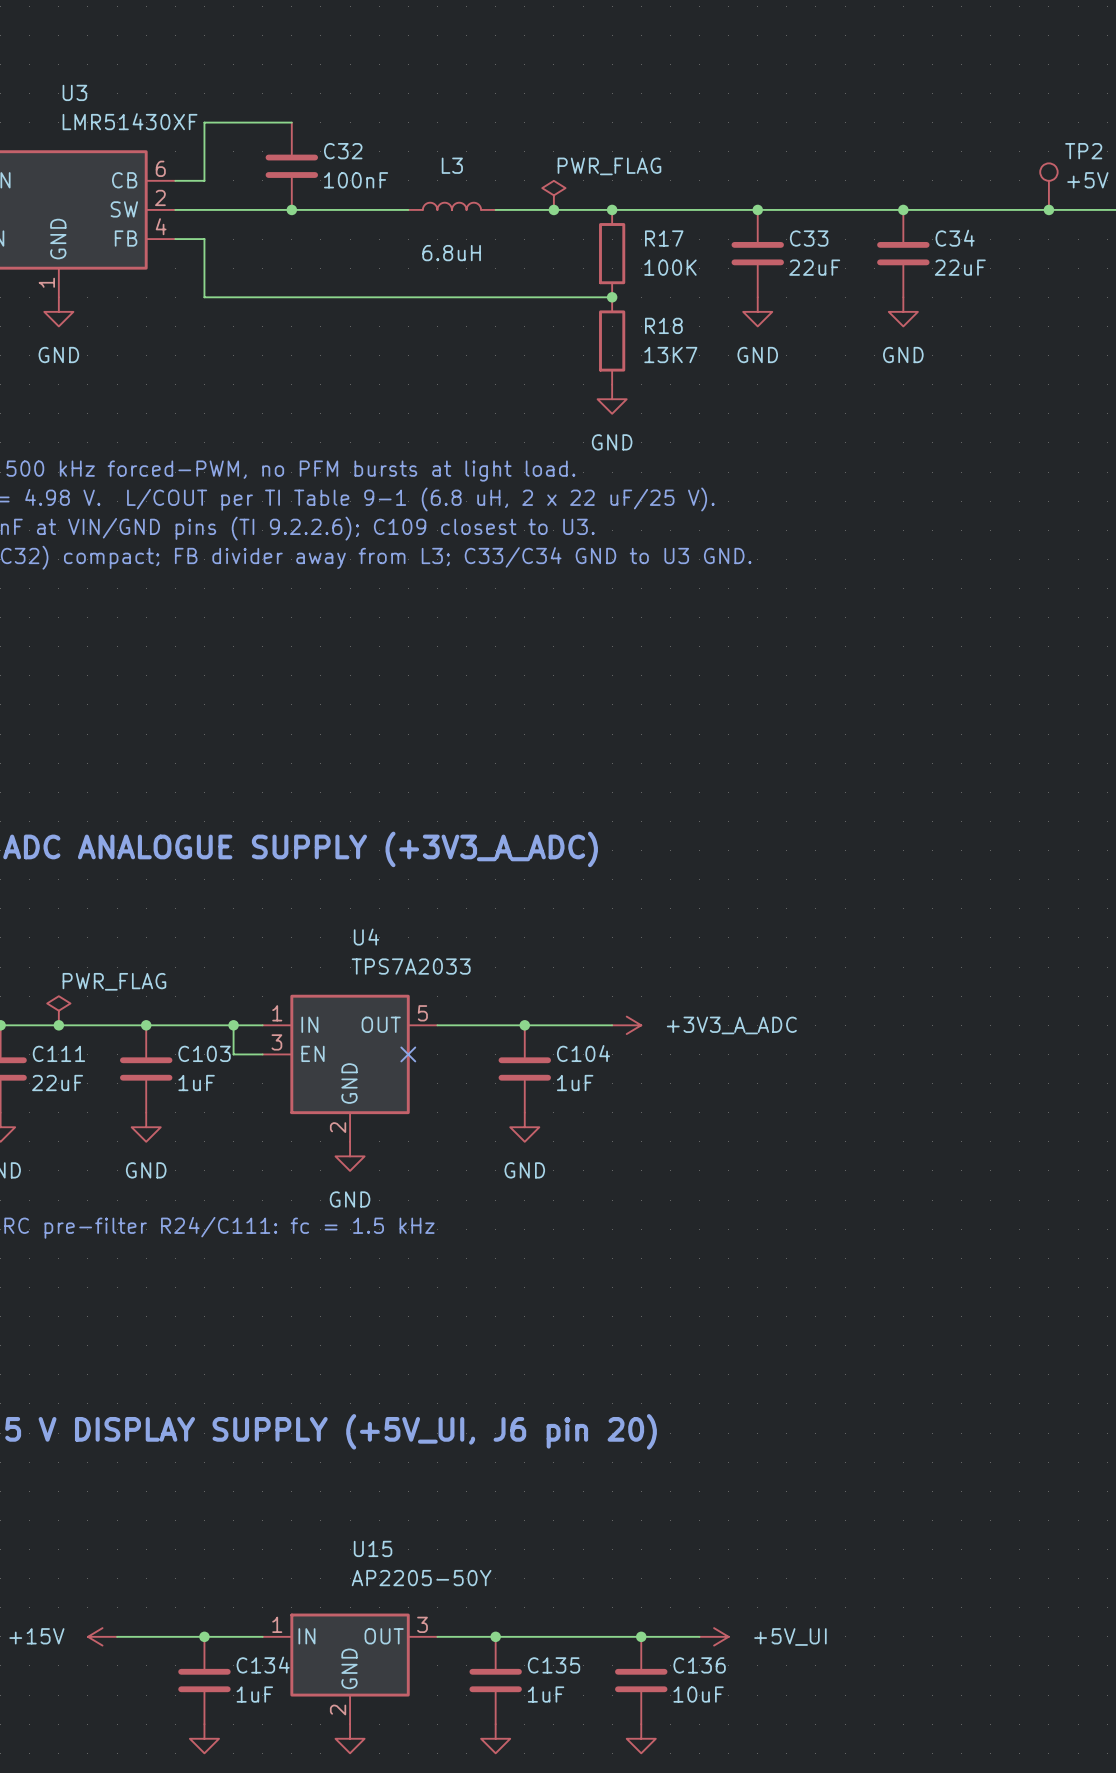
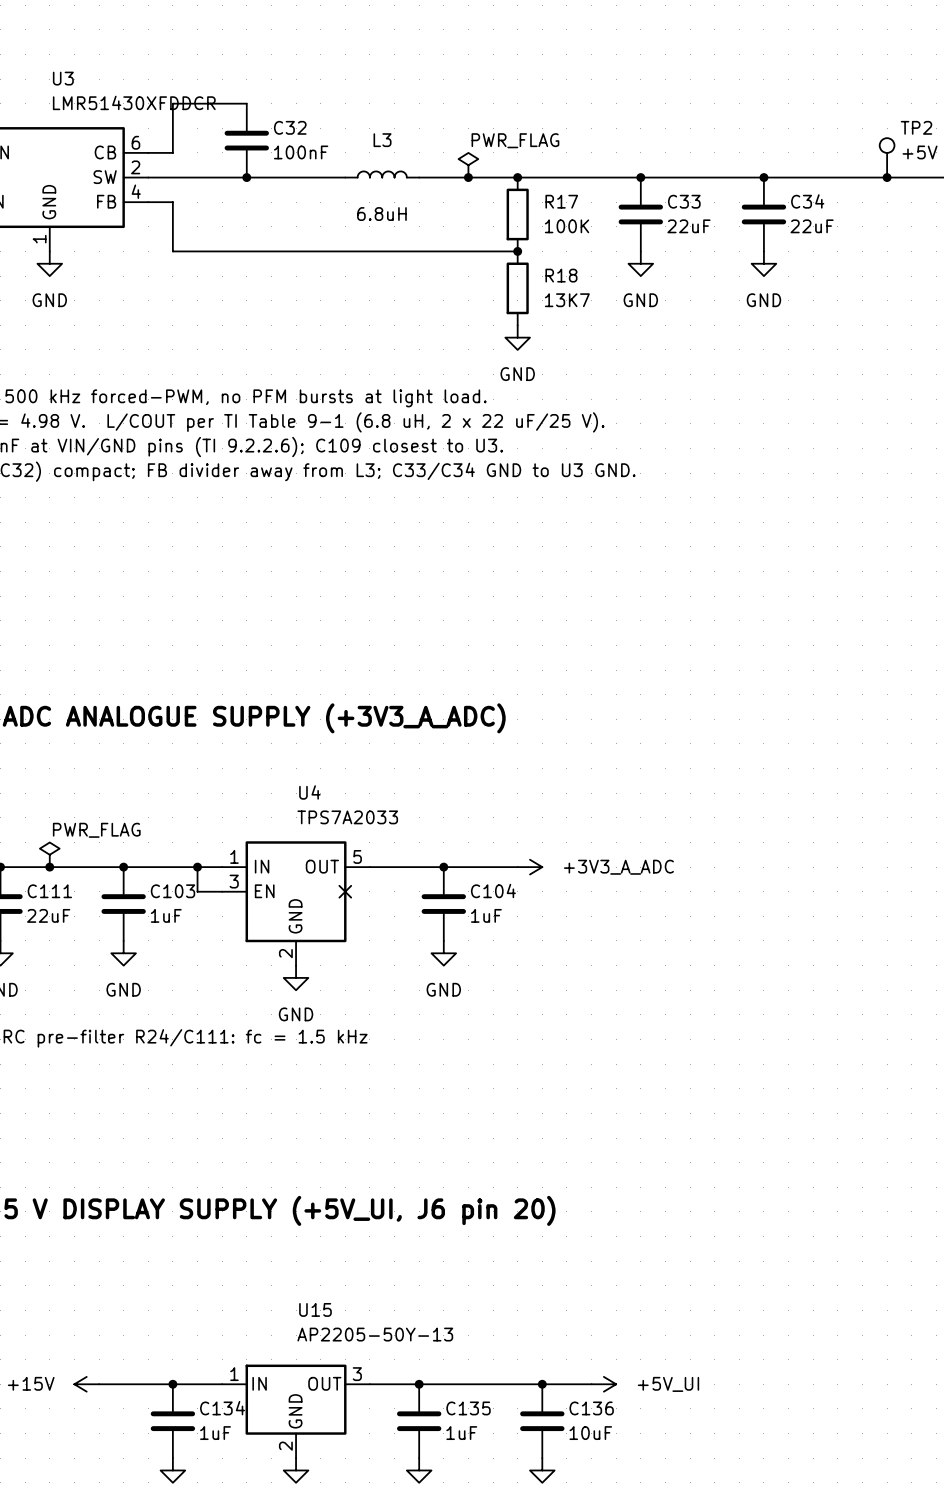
U3 value: LMR51430XF (130, 121) -> LMR51430XFDDCR (134, 102)
U15 value: AP2205-50Y (421, 1578) -> AP2205-50Y-13 (375, 1334)

